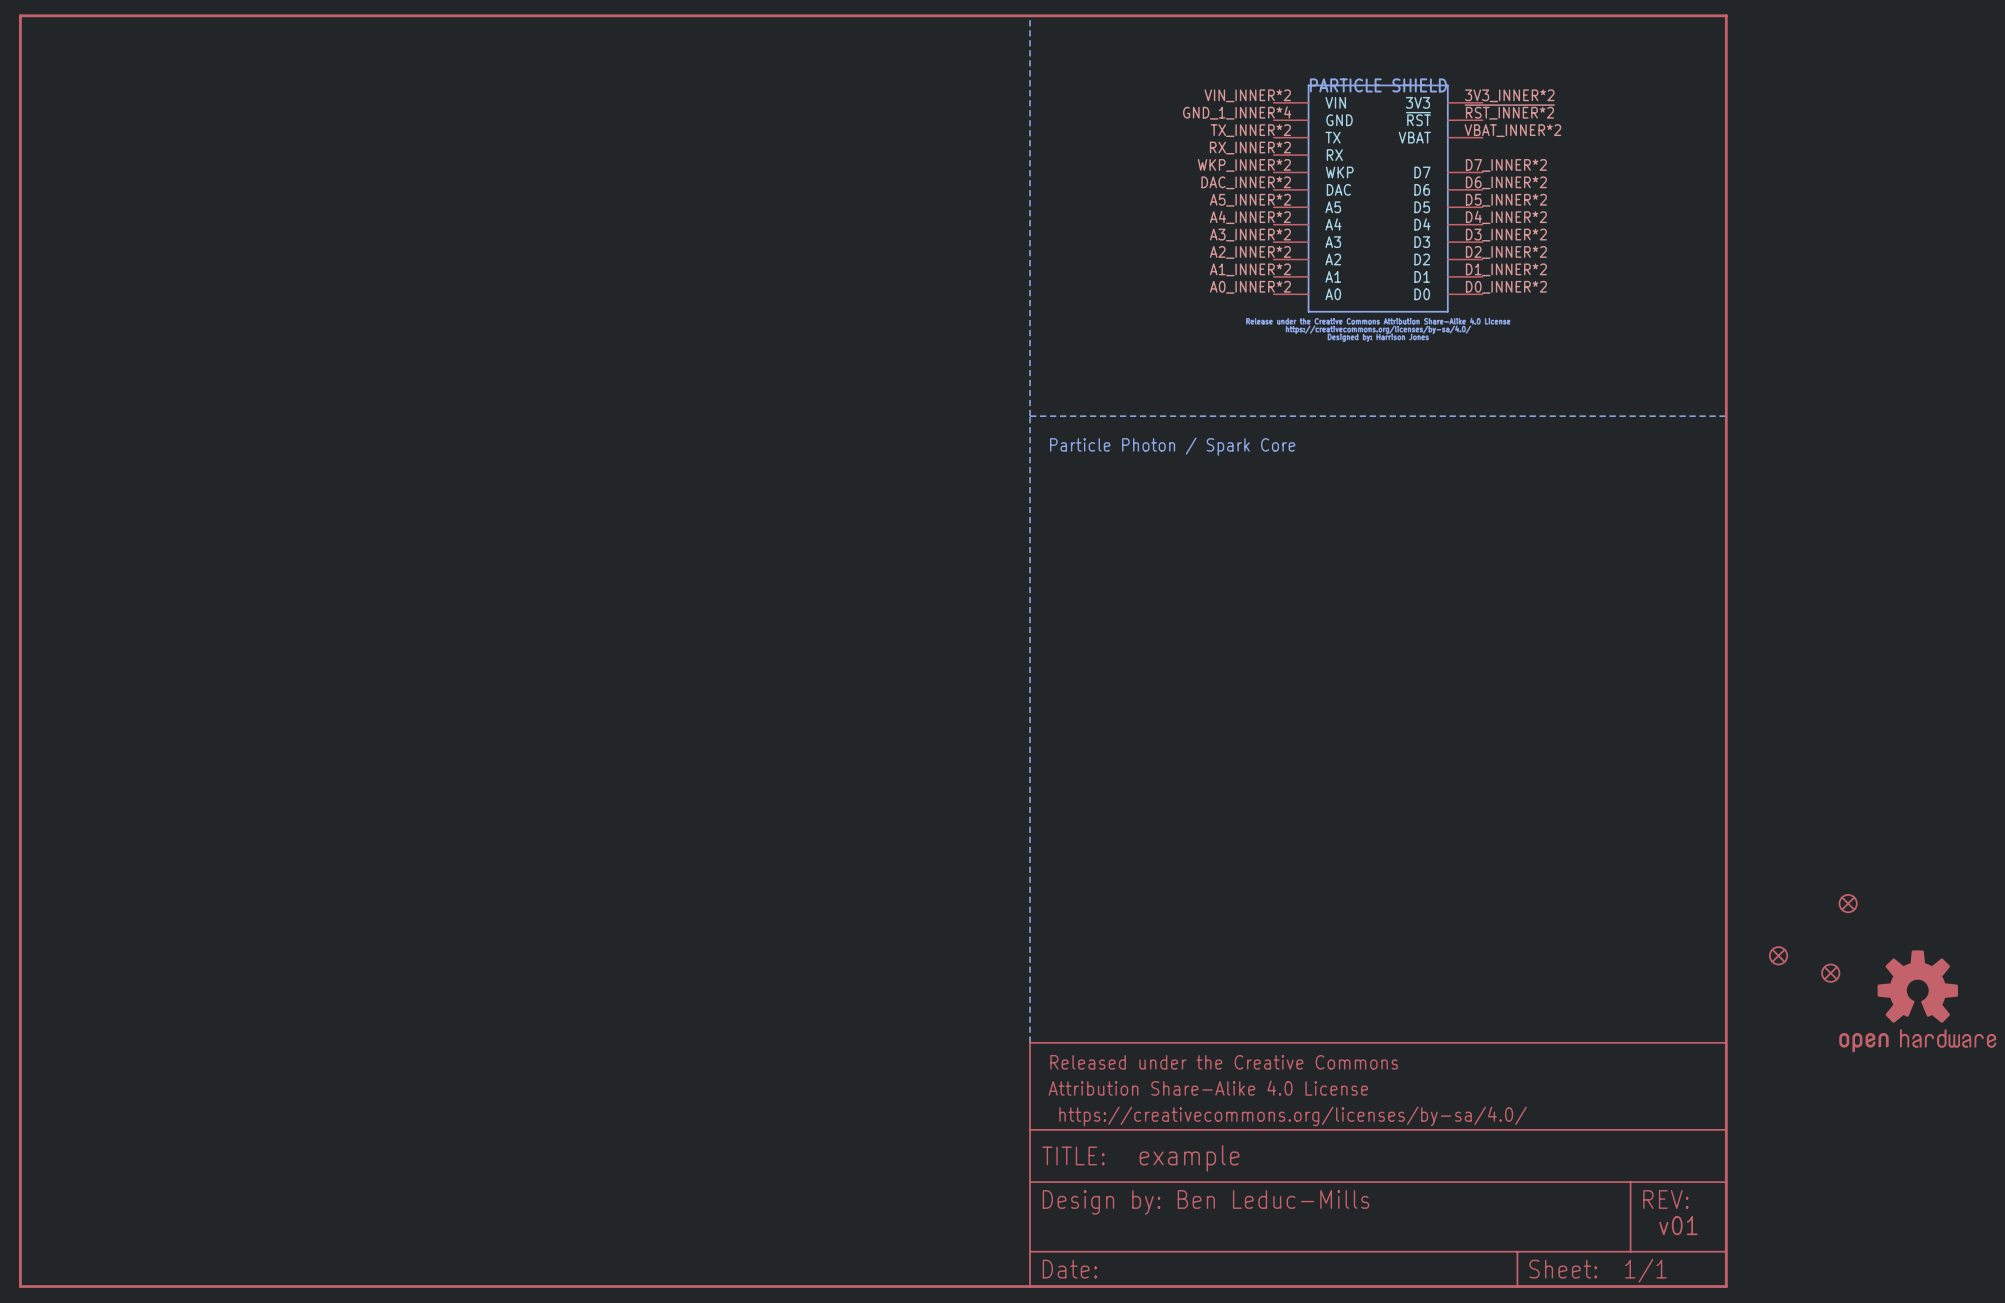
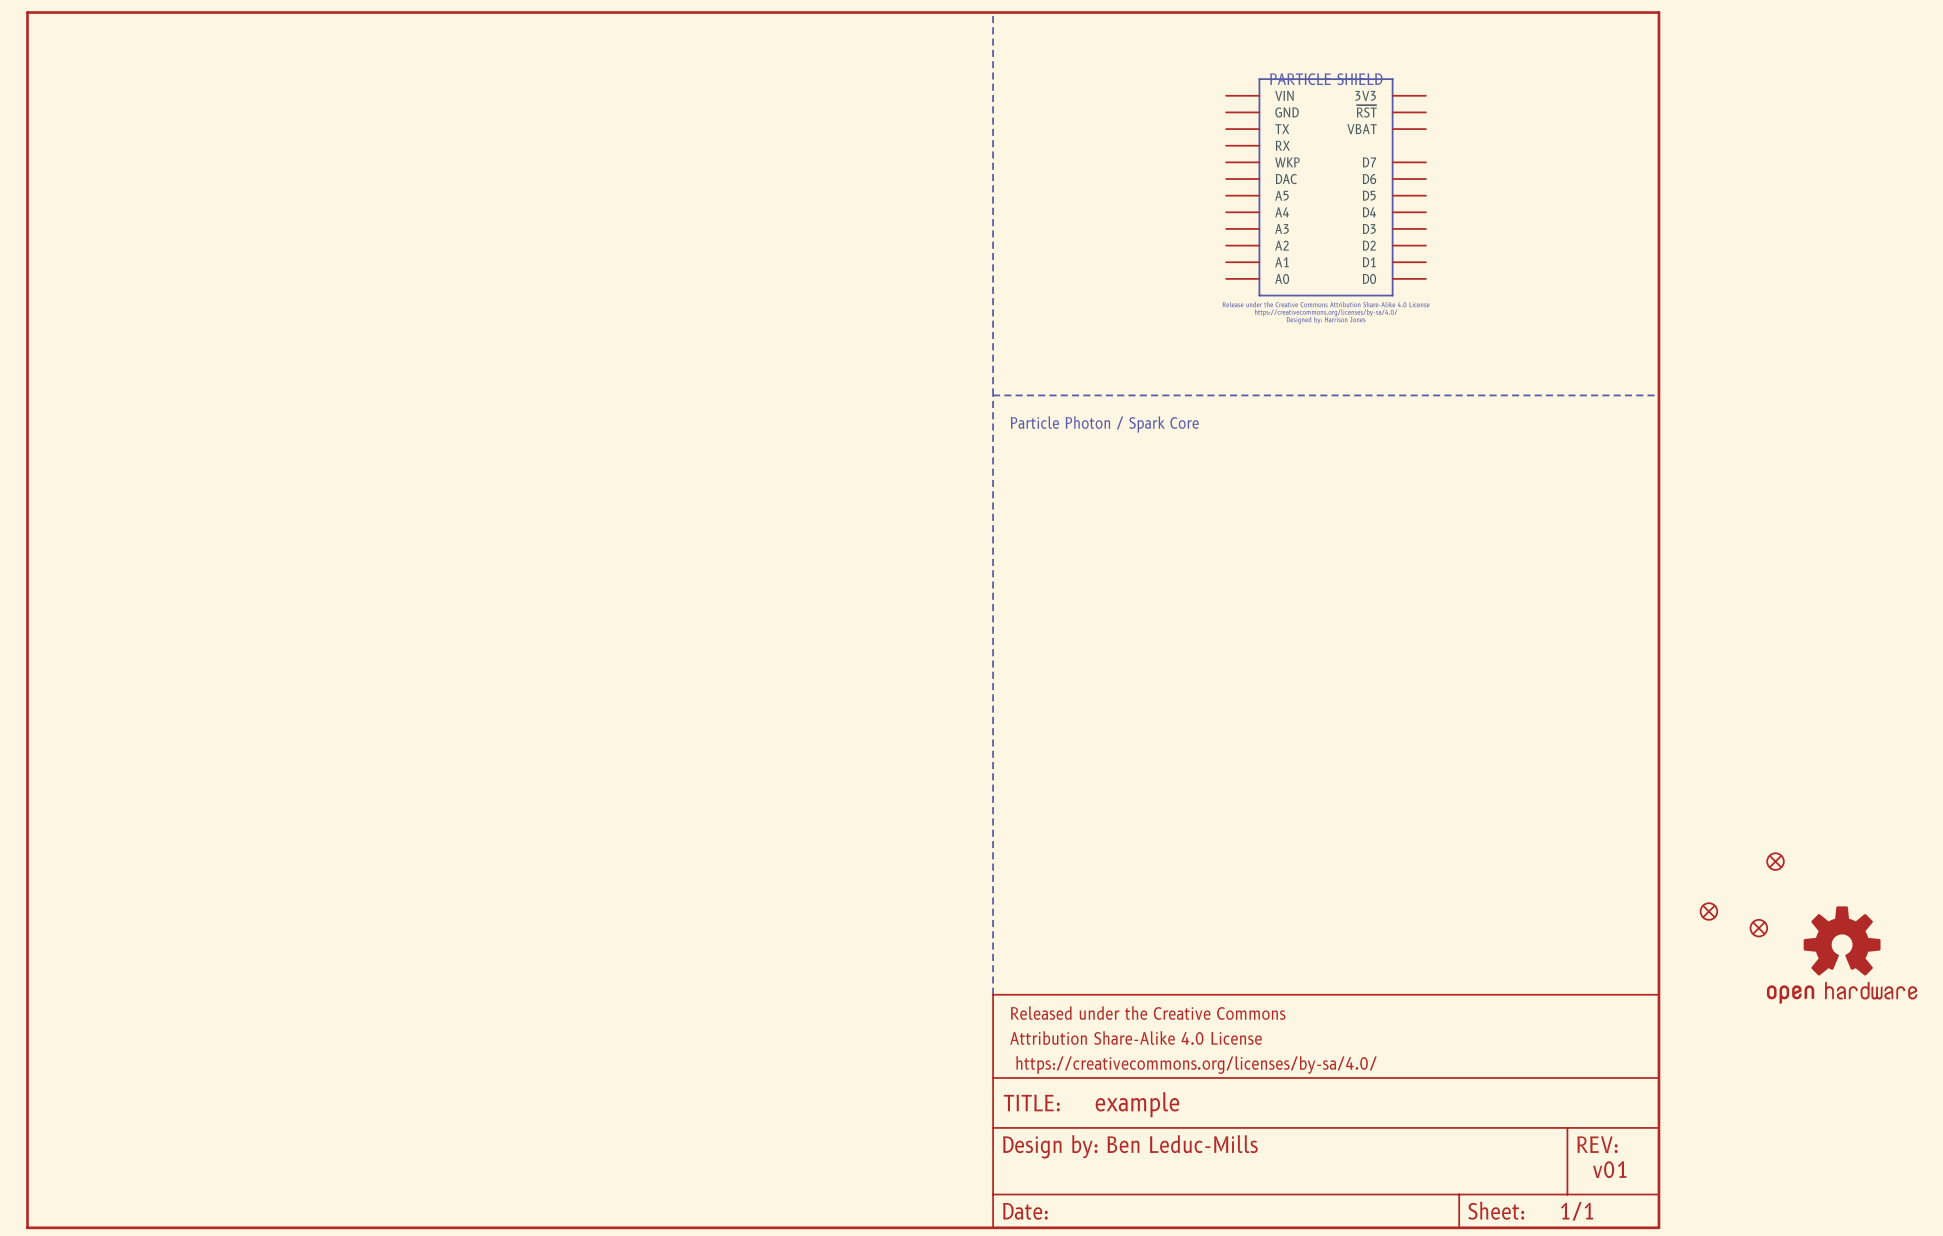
part symbol: [1273, 84, 1483, 313] -> [1226, 78, 1426, 297]

